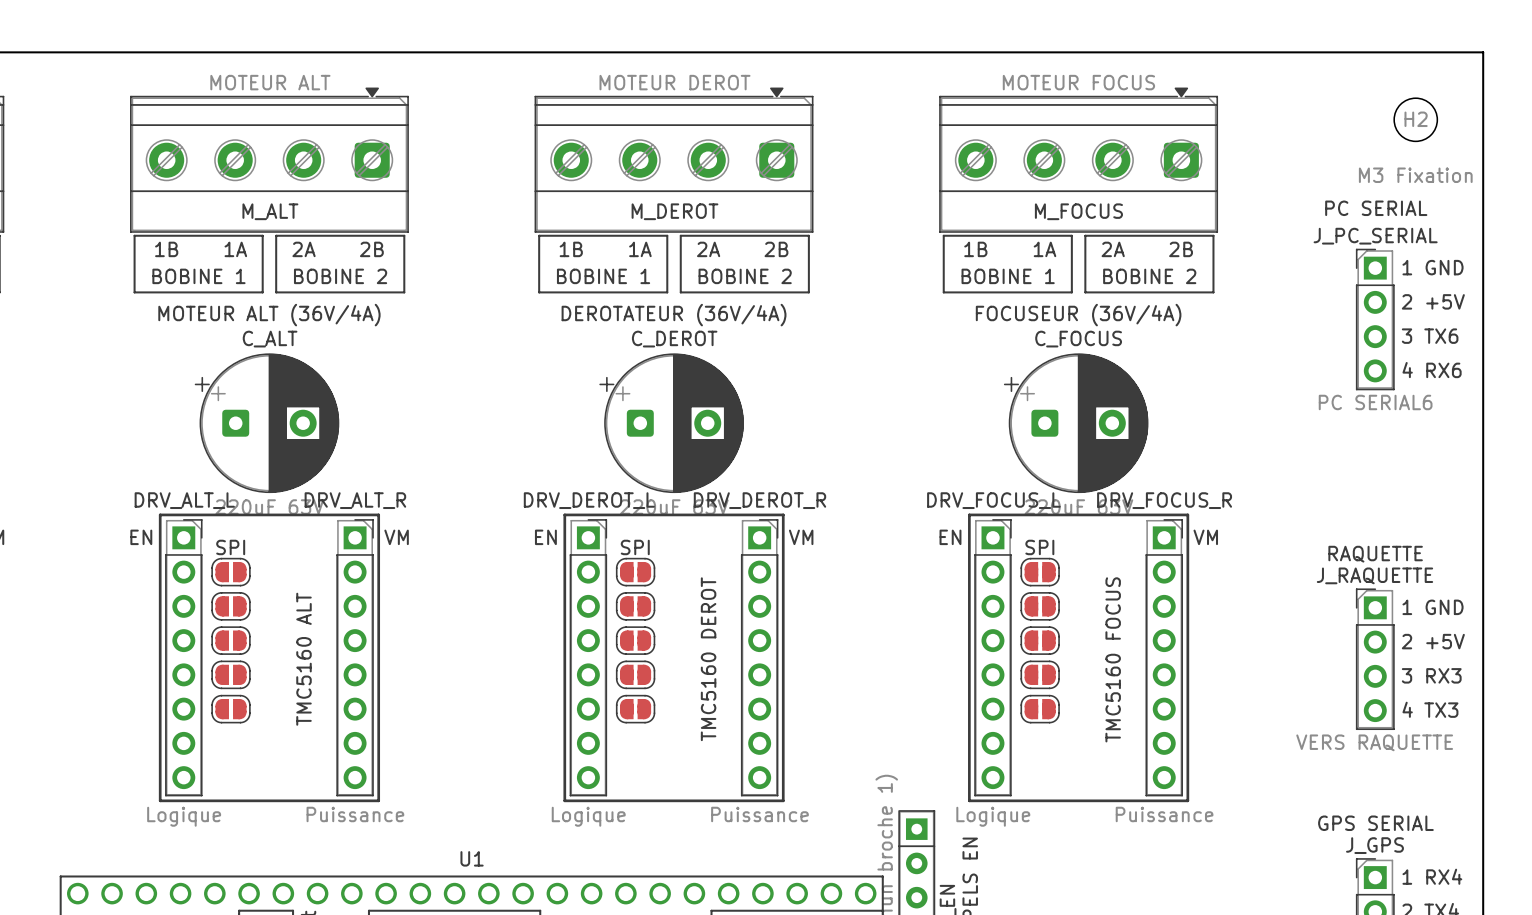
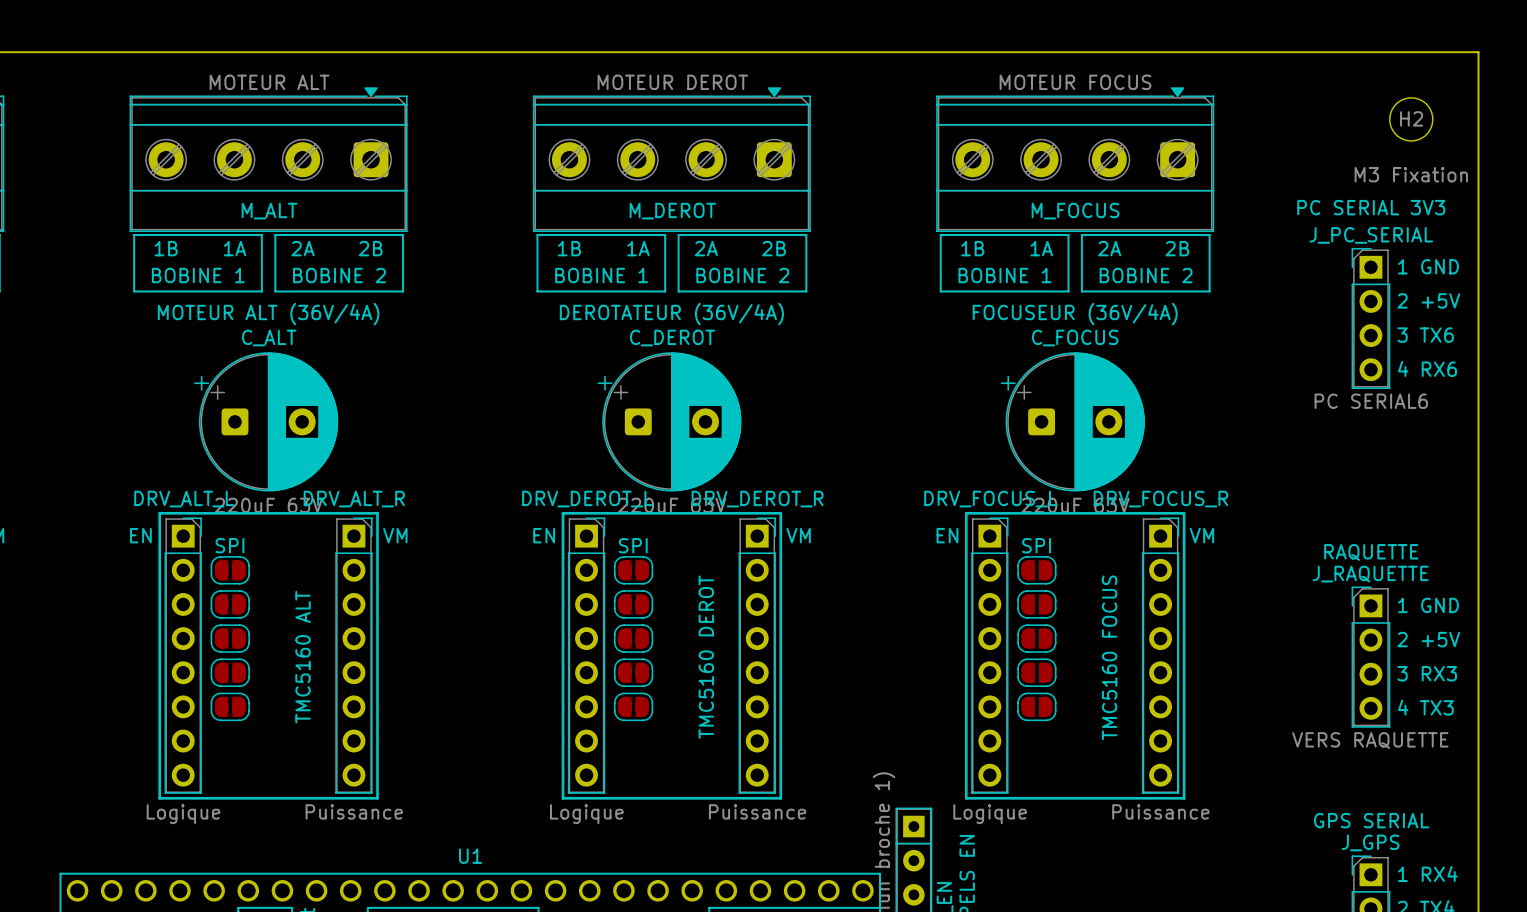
text: PC SERIAL (1376, 208) -> PC SERIAL 3V3 (1371, 207)

